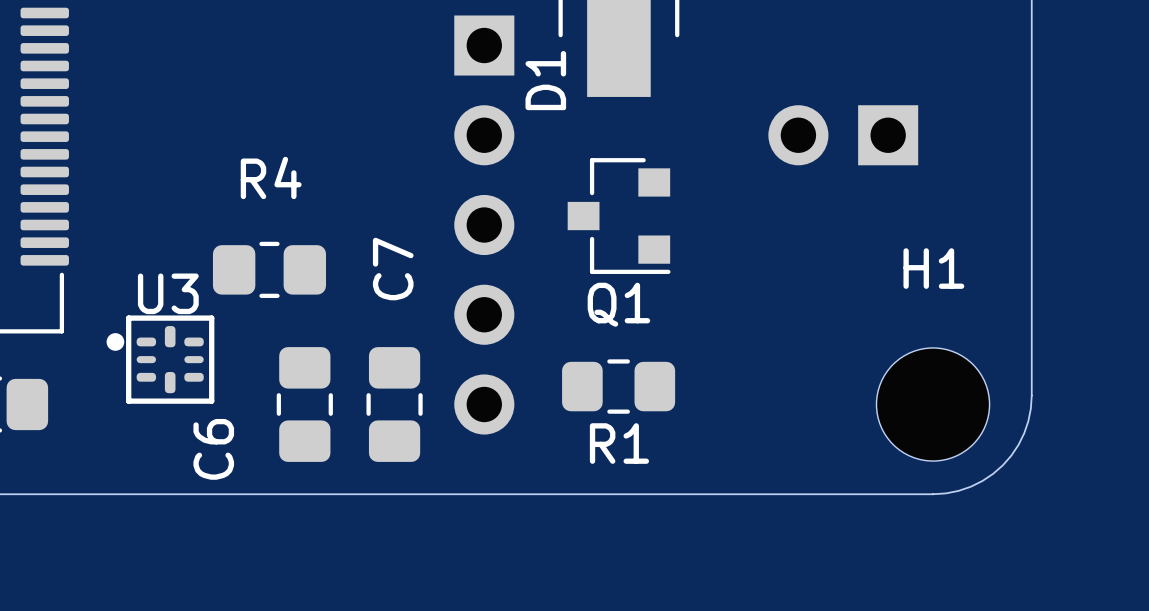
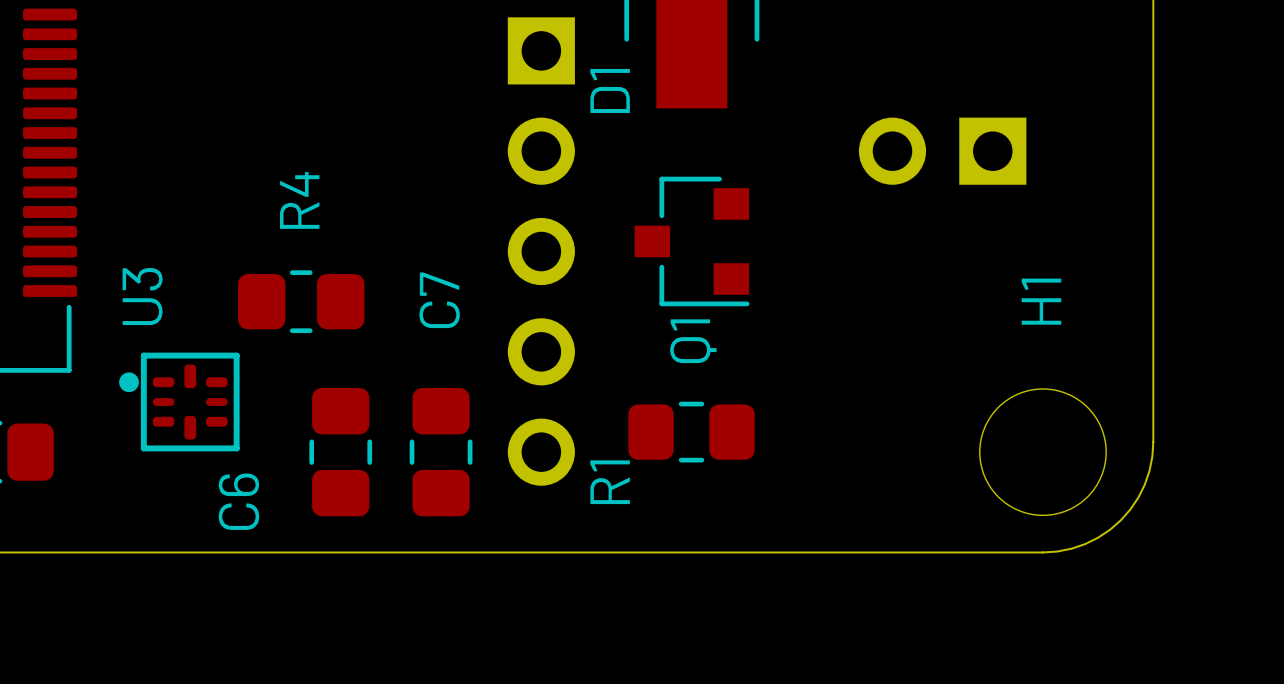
R4 name rotation: 0° (271, 177) -> 90° counterclockwise (299, 200)
H1 name rotation: 0° (933, 268) -> 90° counterclockwise (1041, 301)
U3 name rotation: 0° (168, 293) -> 90° counterclockwise (142, 296)
Q1 name rotation: 0° (618, 304) -> 90° counterclockwise (693, 341)
R1 name rotation: 0° (619, 443) -> 90° counterclockwise (610, 482)

